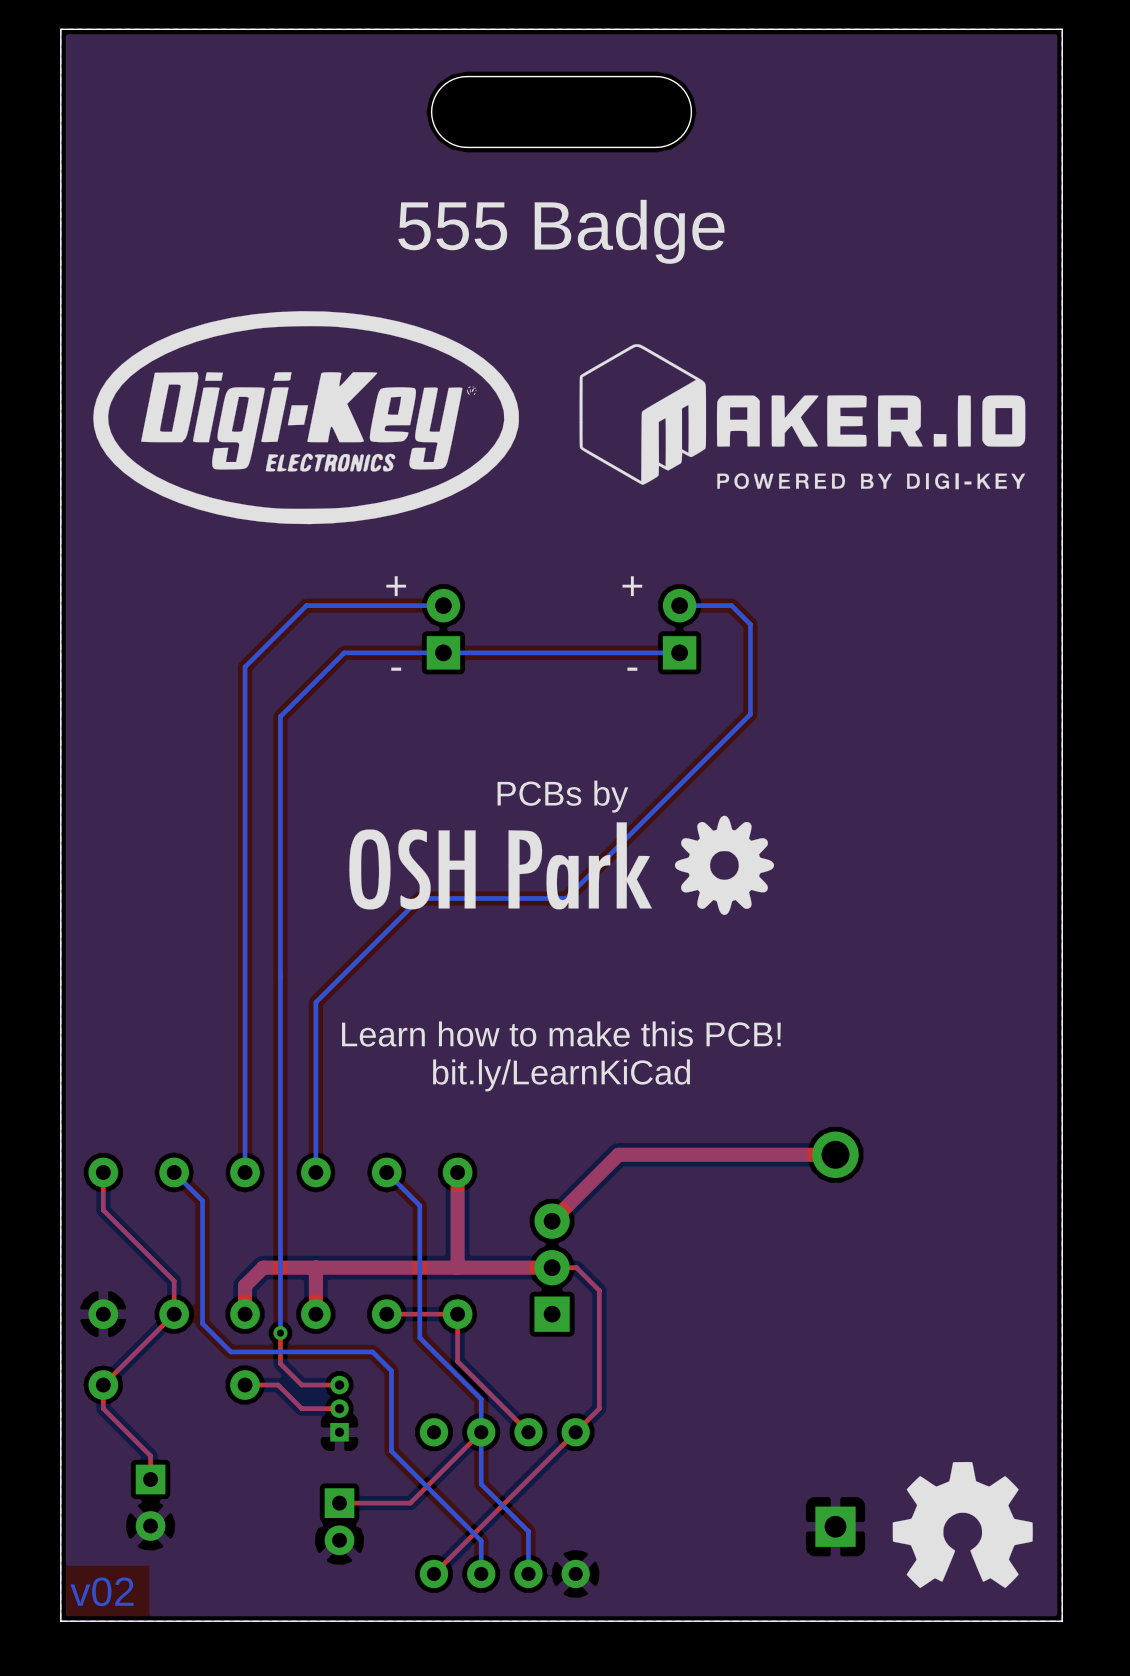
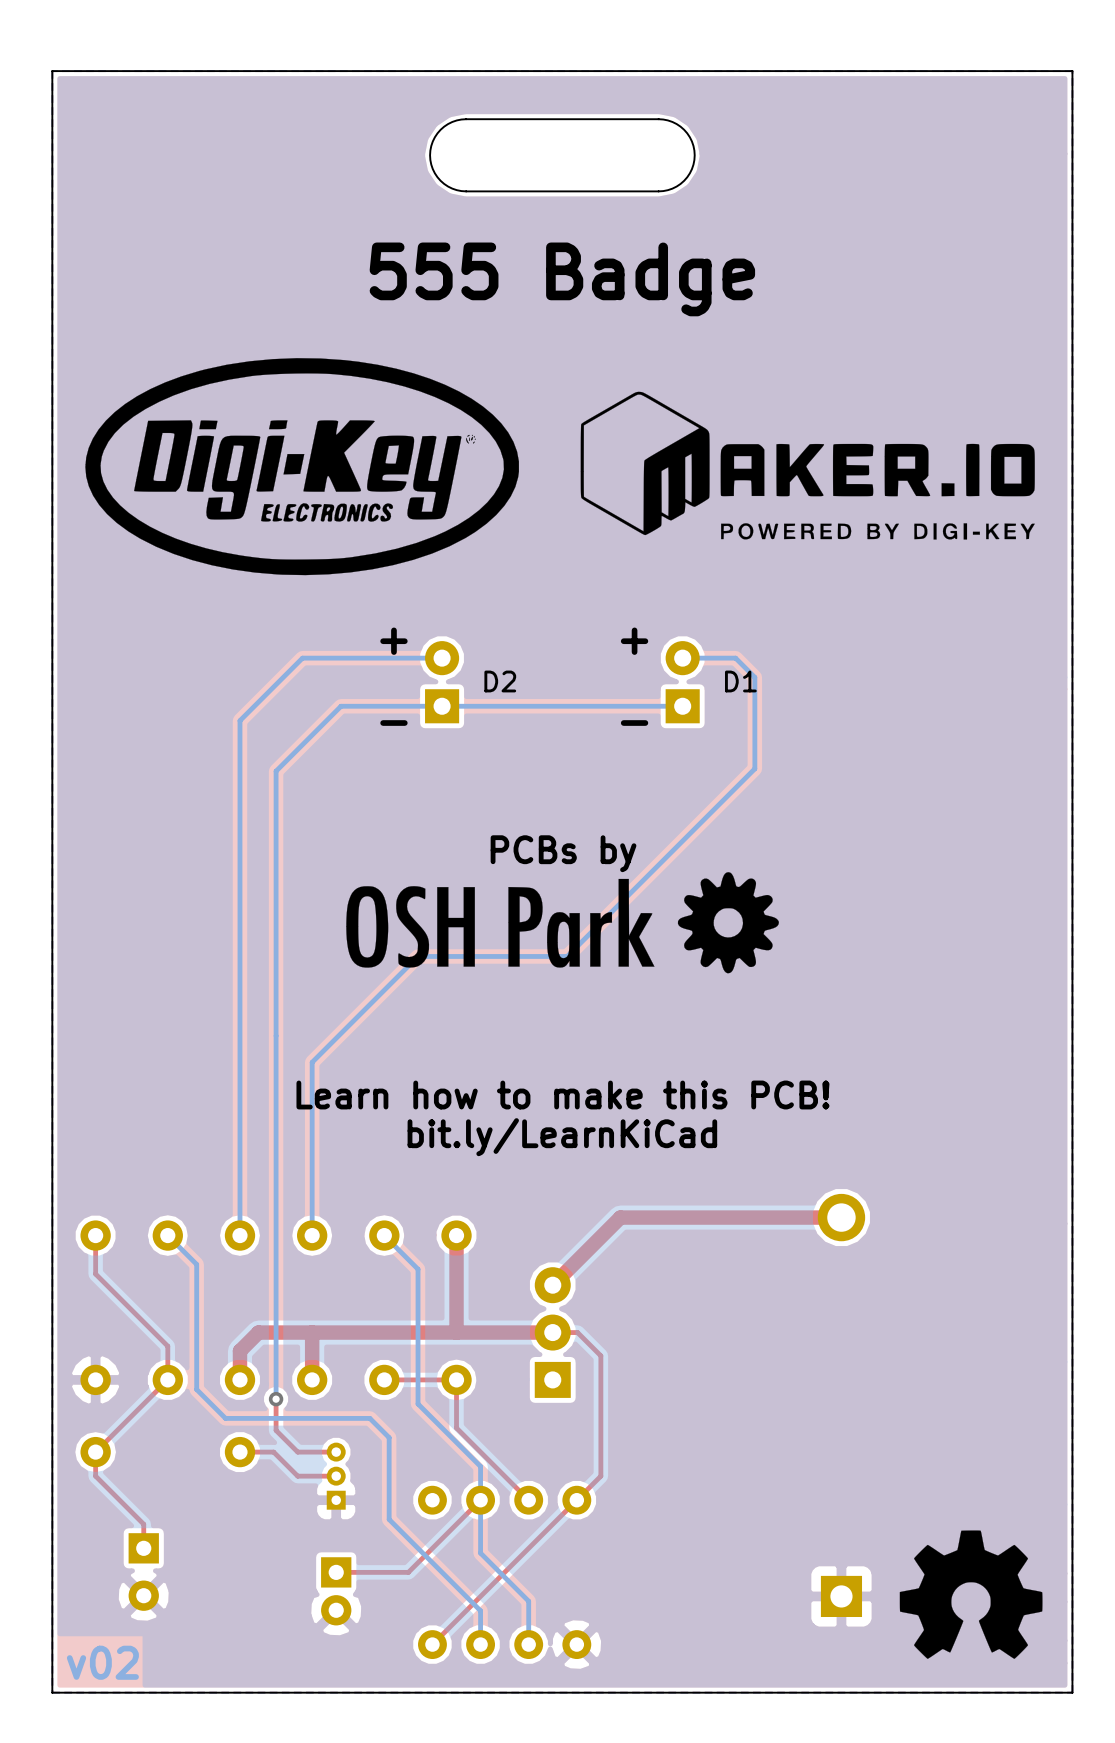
text: none -> D2 (500, 681)
text: none -> D1 (740, 681)

